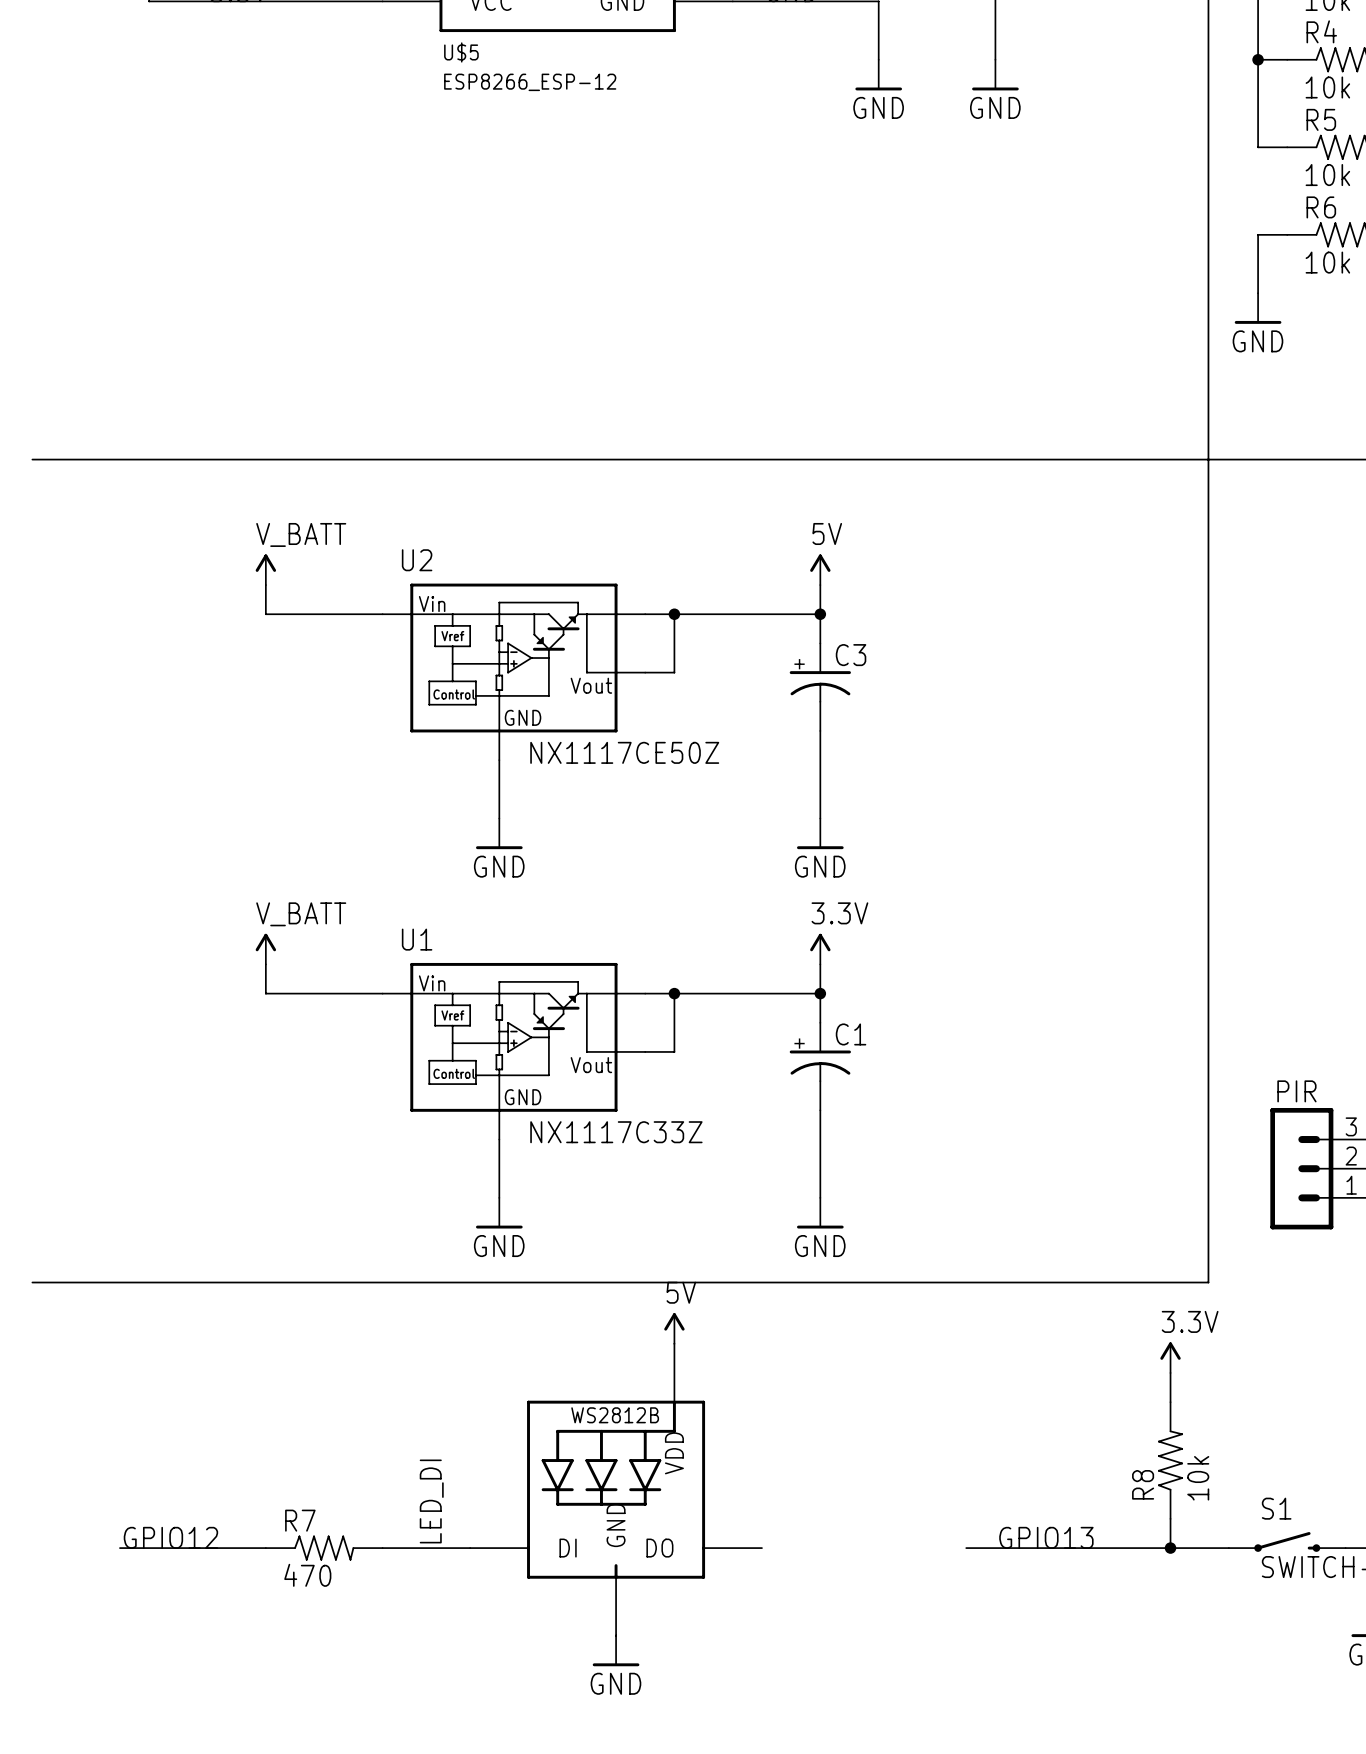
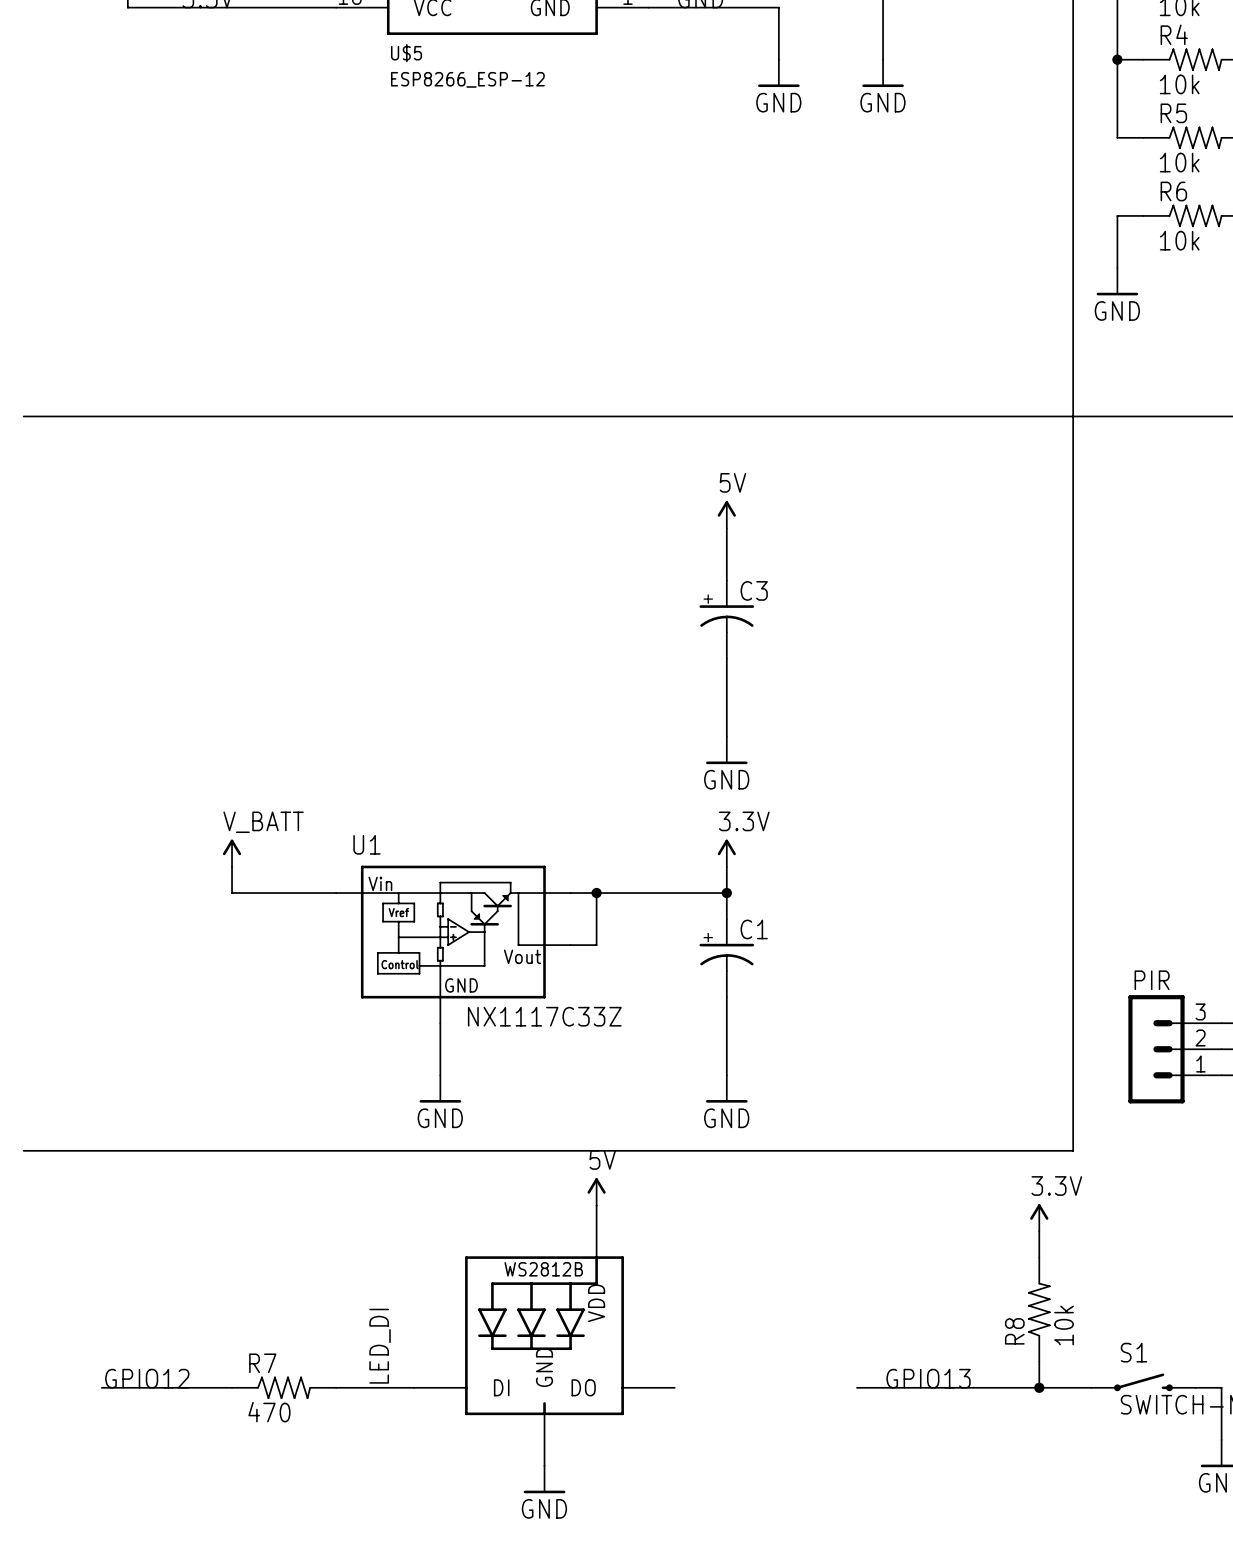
power symbol: V_BATT (265, 569) -> none
wire: (265, 585) (265, 614) (382, 614) -> none
wire: (645, 614) (820, 614) -> none
wire: (674, 614) (674, 672) (645, 672) -> none
junction: (674, 614) -> none
junction: (820, 614) -> none
U2: NX1117CE50Z (513, 671) -> none
wire: (499, 760) (499, 818) -> none
power symbol: GND (499, 833) -> none

